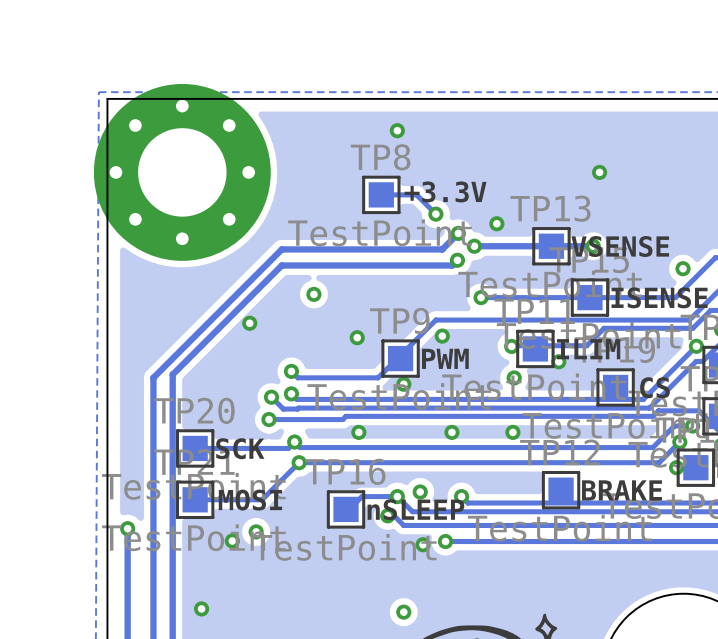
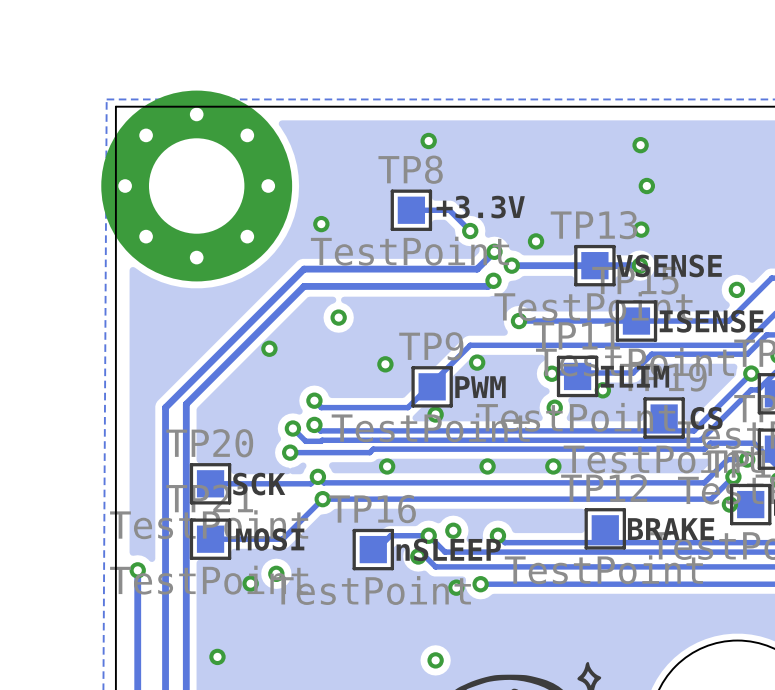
via: none -> (640, 145)
via: none -> (321, 224)
via: none -> (641, 229)

